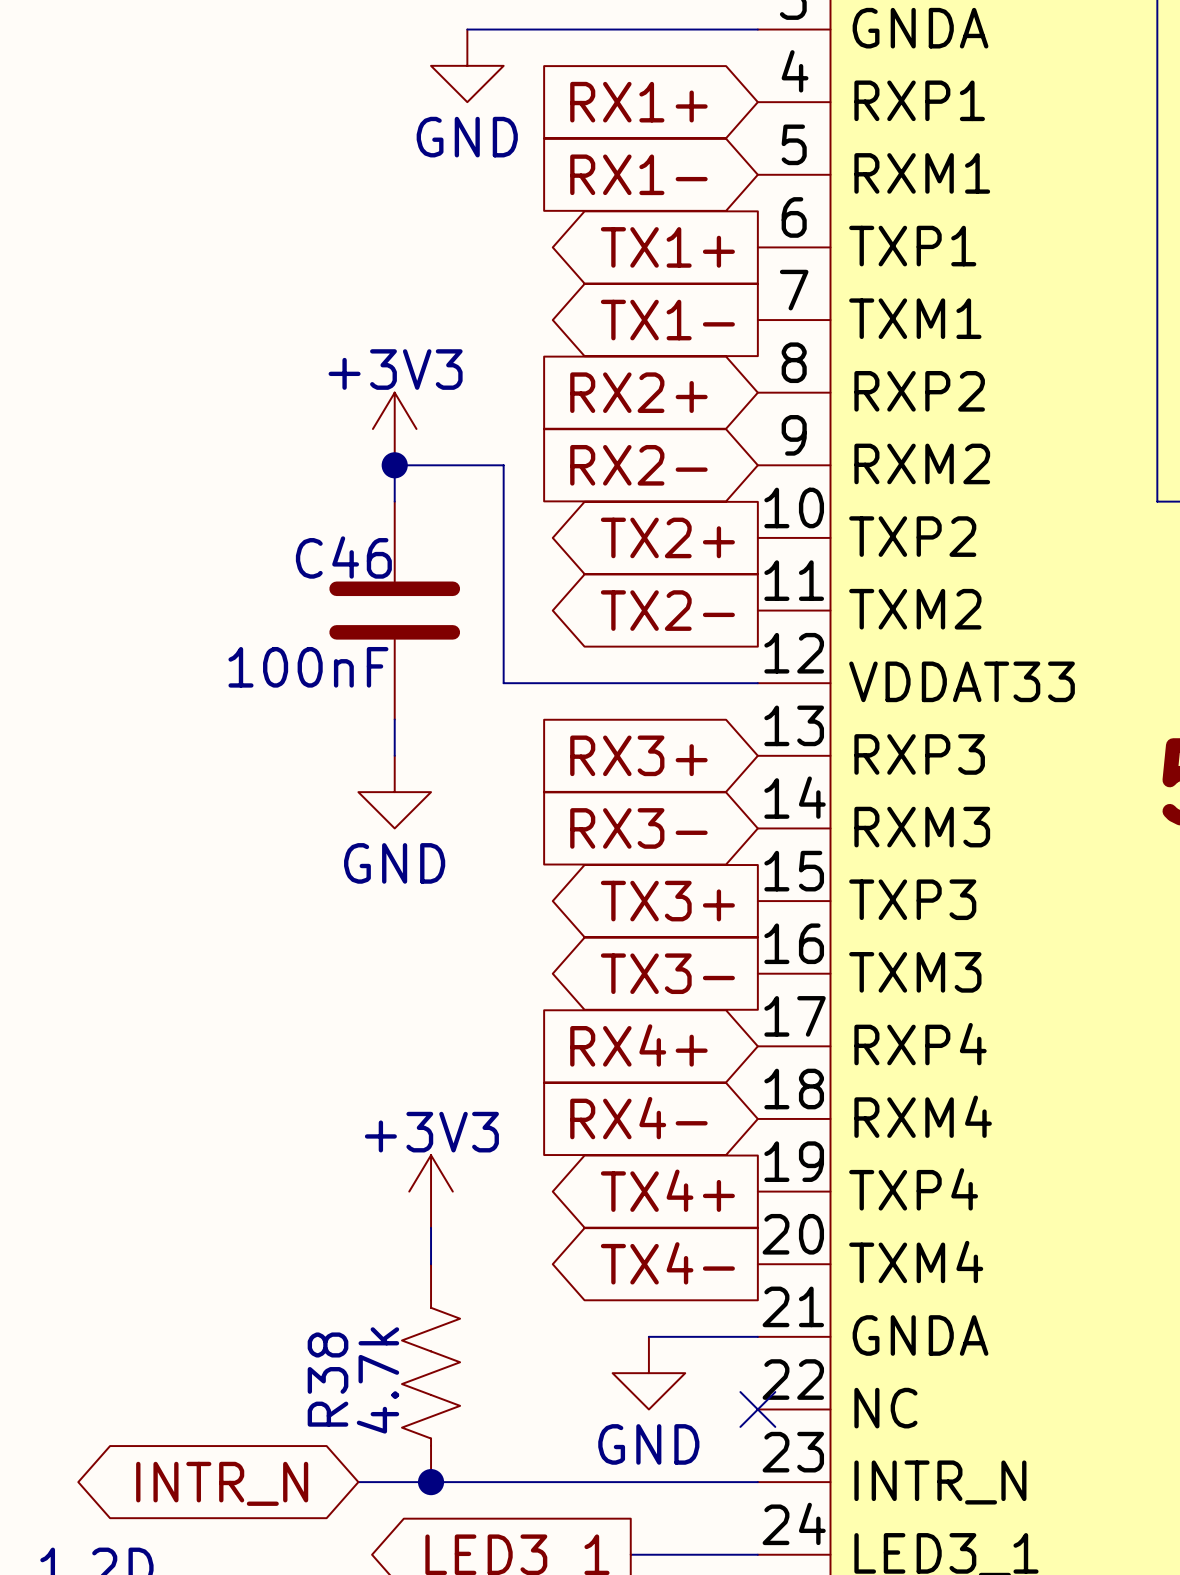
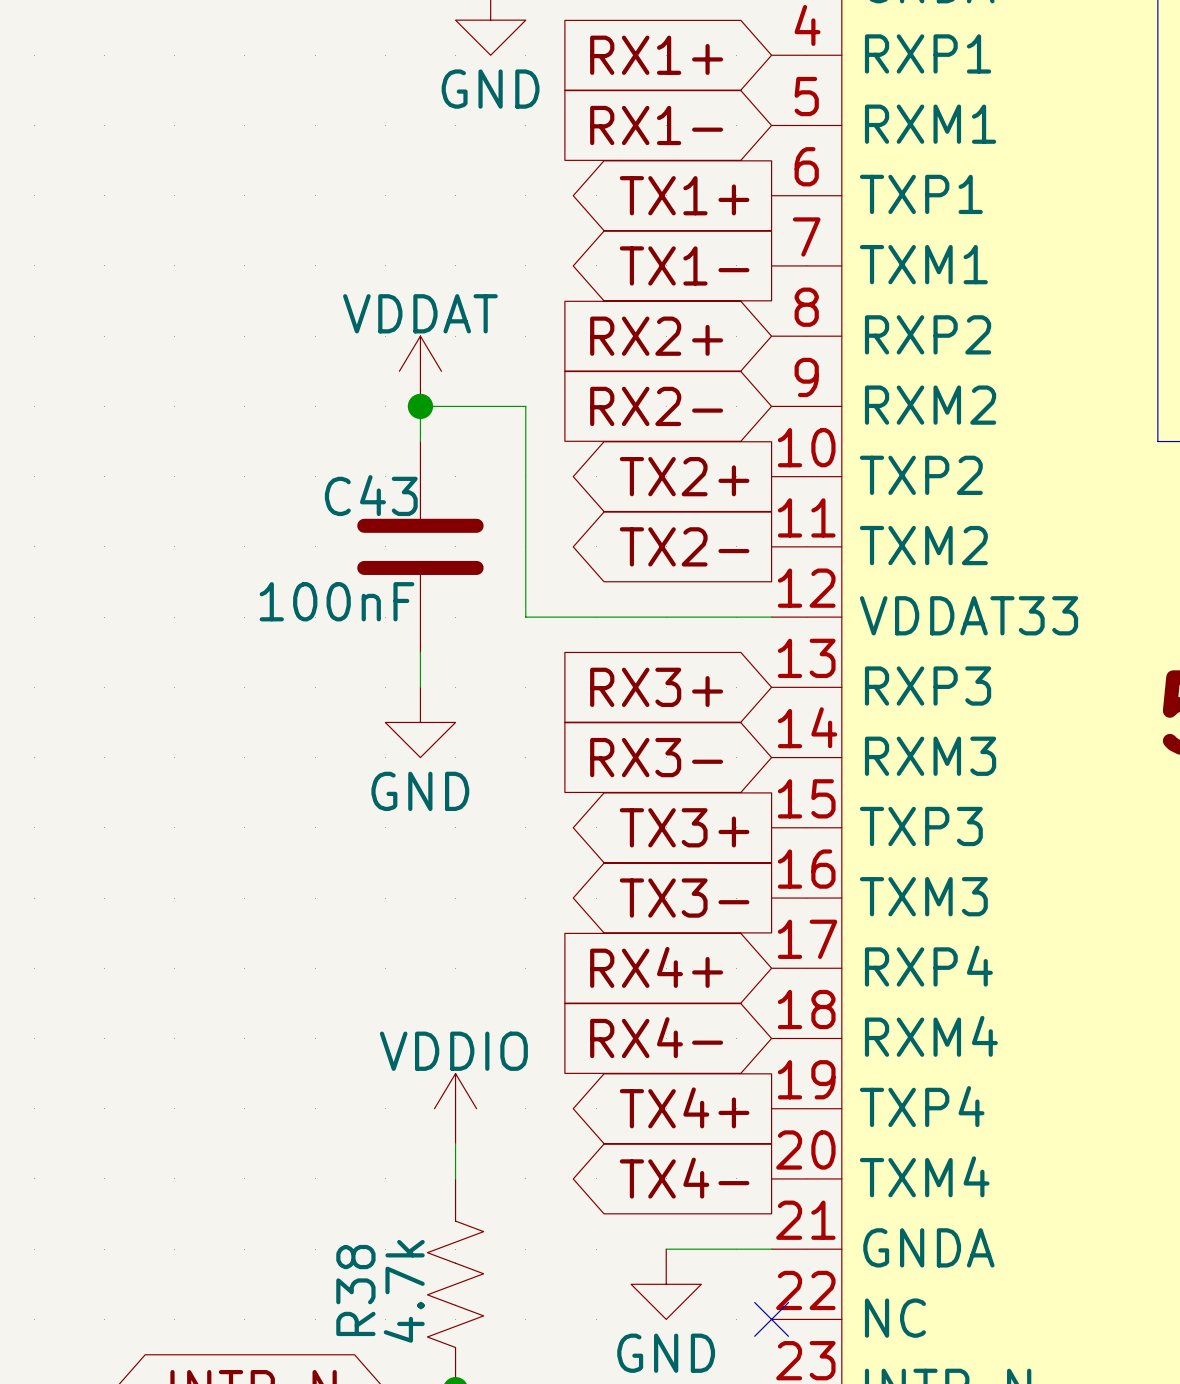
power symbol: +3V3 (394, 428) -> VDDAT (420, 371)
C46 name: C46 (343, 557) -> C43 (371, 495)
power symbol: +3V3 (431, 1191) -> VDDIO (455, 1108)

